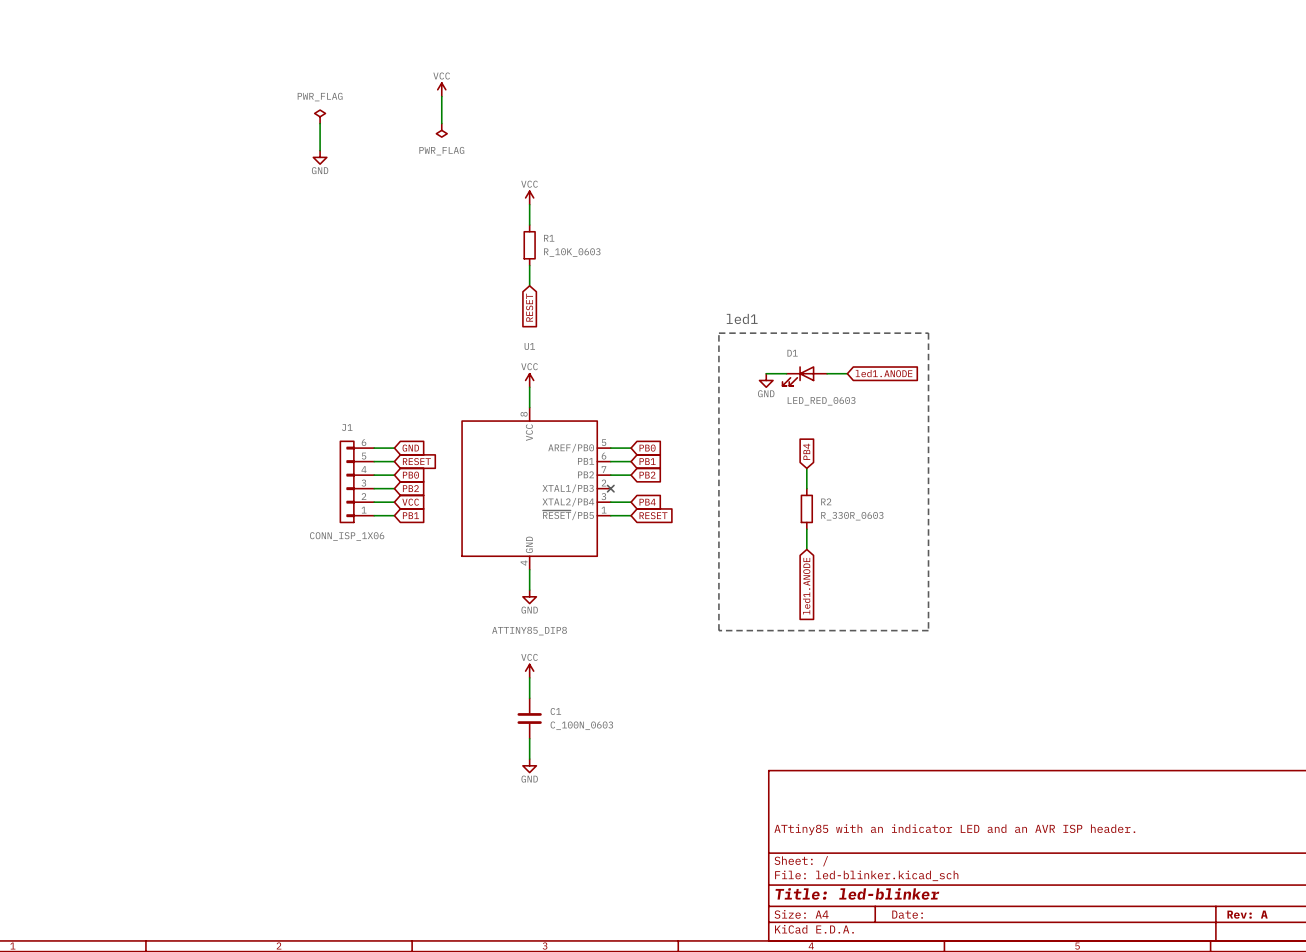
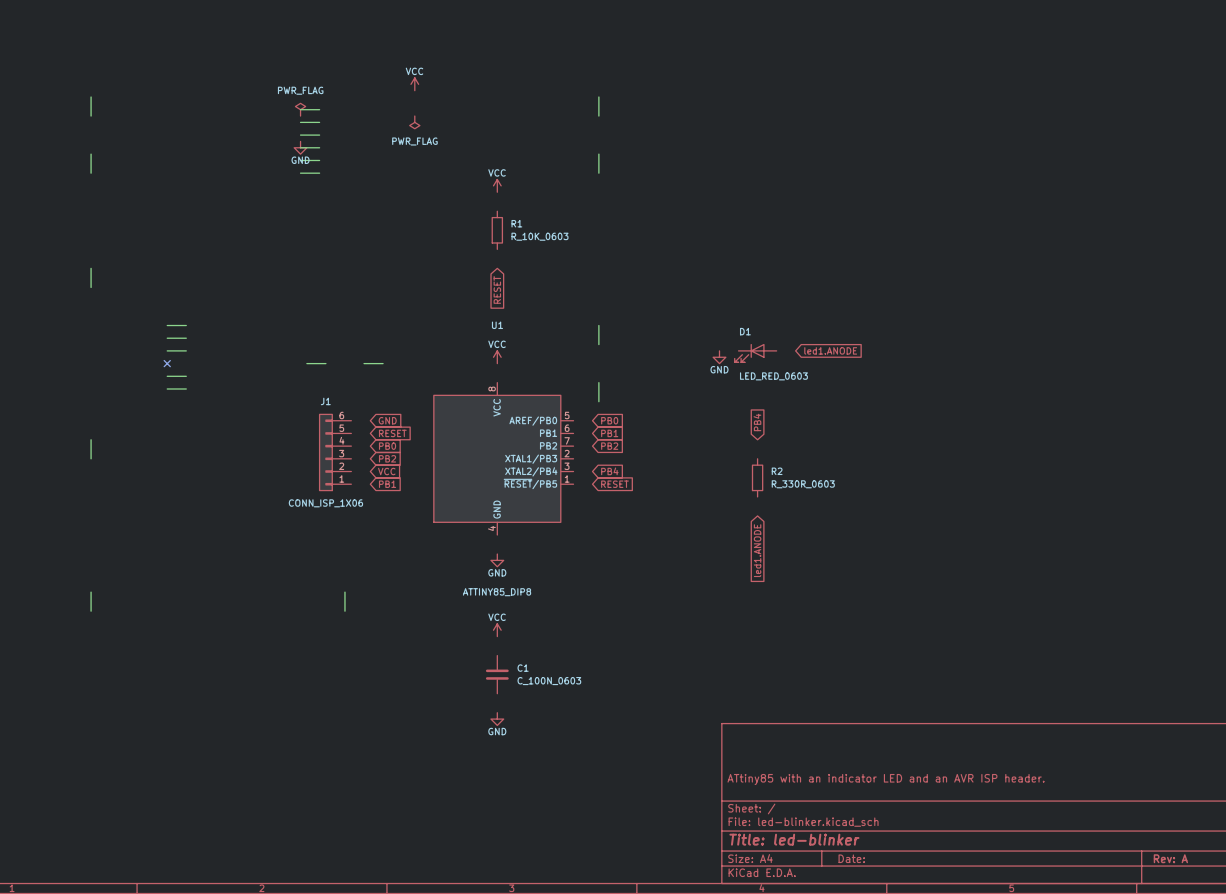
wire: (441, 96) (441, 123) -> none
wire: none -> (91, 97) (91, 116)
wire: none -> (598, 97) (598, 116)
wire: none -> (300, 109) (319, 109)
wire: (320, 123) (320, 150) -> none
wire: none -> (300, 122) (319, 122)
wire: none -> (300, 135) (319, 135)
wire: none -> (300, 147) (319, 147)
wire: none -> (91, 154) (91, 173)
wire: none -> (300, 160) (319, 160)
wire: none -> (300, 173) (319, 173)
wire: (529, 204) (529, 224) -> (598, 154) (598, 173)
wire: (529, 265) (529, 285) -> none
wire: none -> (91, 268) (91, 287)
text: led1 (742, 318) -> none
line: (718, 333) (928, 333) (928, 630) (718, 630) (718, 333) -> none
wire: none -> (167, 325) (186, 325)
wire: none -> (167, 338) (186, 338)
wire: none -> (167, 350) (186, 350)
wire: (766, 373) (786, 373) -> none
wire: (827, 373) (847, 373) -> none
no-connect mark: none -> (167, 363)
wire: (529, 387) (529, 407) -> (598, 325) (598, 344)
wire: none -> (167, 376) (186, 376)
wire: none -> (598, 382) (598, 401)
wire: none -> (167, 389) (186, 389)
wire: (374, 448) (394, 448) -> (364, 363) (383, 363)
wire: (610, 448) (631, 448) -> none
wire: (374, 461) (394, 461) -> (306, 363) (325, 363)
wire: (610, 461) (631, 461) -> none
wire: none -> (91, 439) (91, 458)
wire: (806, 468) (806, 488) -> none
wire: (374, 475) (394, 475) -> none
wire: (610, 475) (631, 475) -> none
wire: (374, 488) (394, 488) -> none
no-connect mark: (610, 488) -> none
wire: (374, 502) (394, 502) -> none
wire: (610, 502) (631, 502) -> none
wire: (374, 515) (394, 515) -> none
wire: (610, 515) (631, 515) -> none
wire: (806, 529) (806, 549) -> none
wire: (529, 569) (529, 590) -> none
wire: none -> (91, 592) (91, 611)
wire: none -> (344, 592) (344, 611)
wire: (529, 677) (529, 698) -> none
wire: (529, 738) (529, 759) -> none

